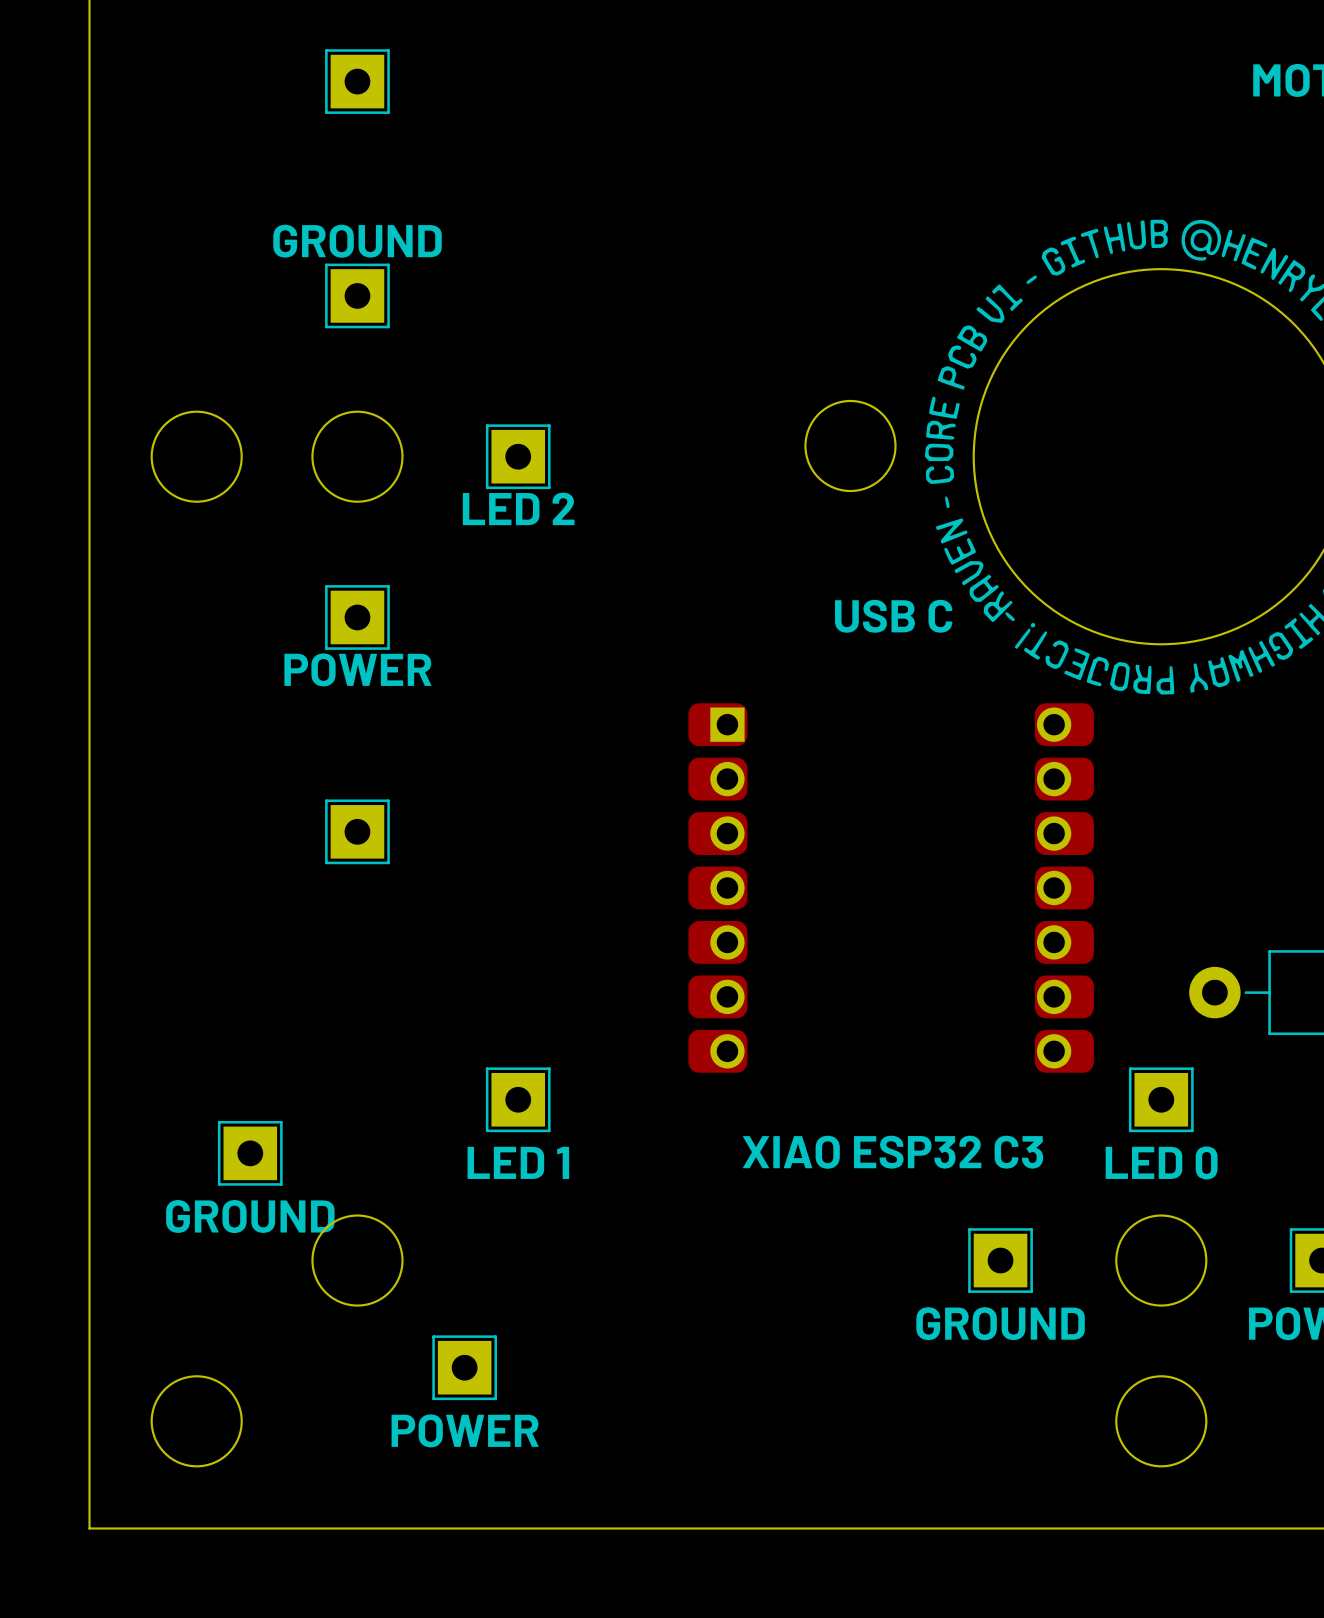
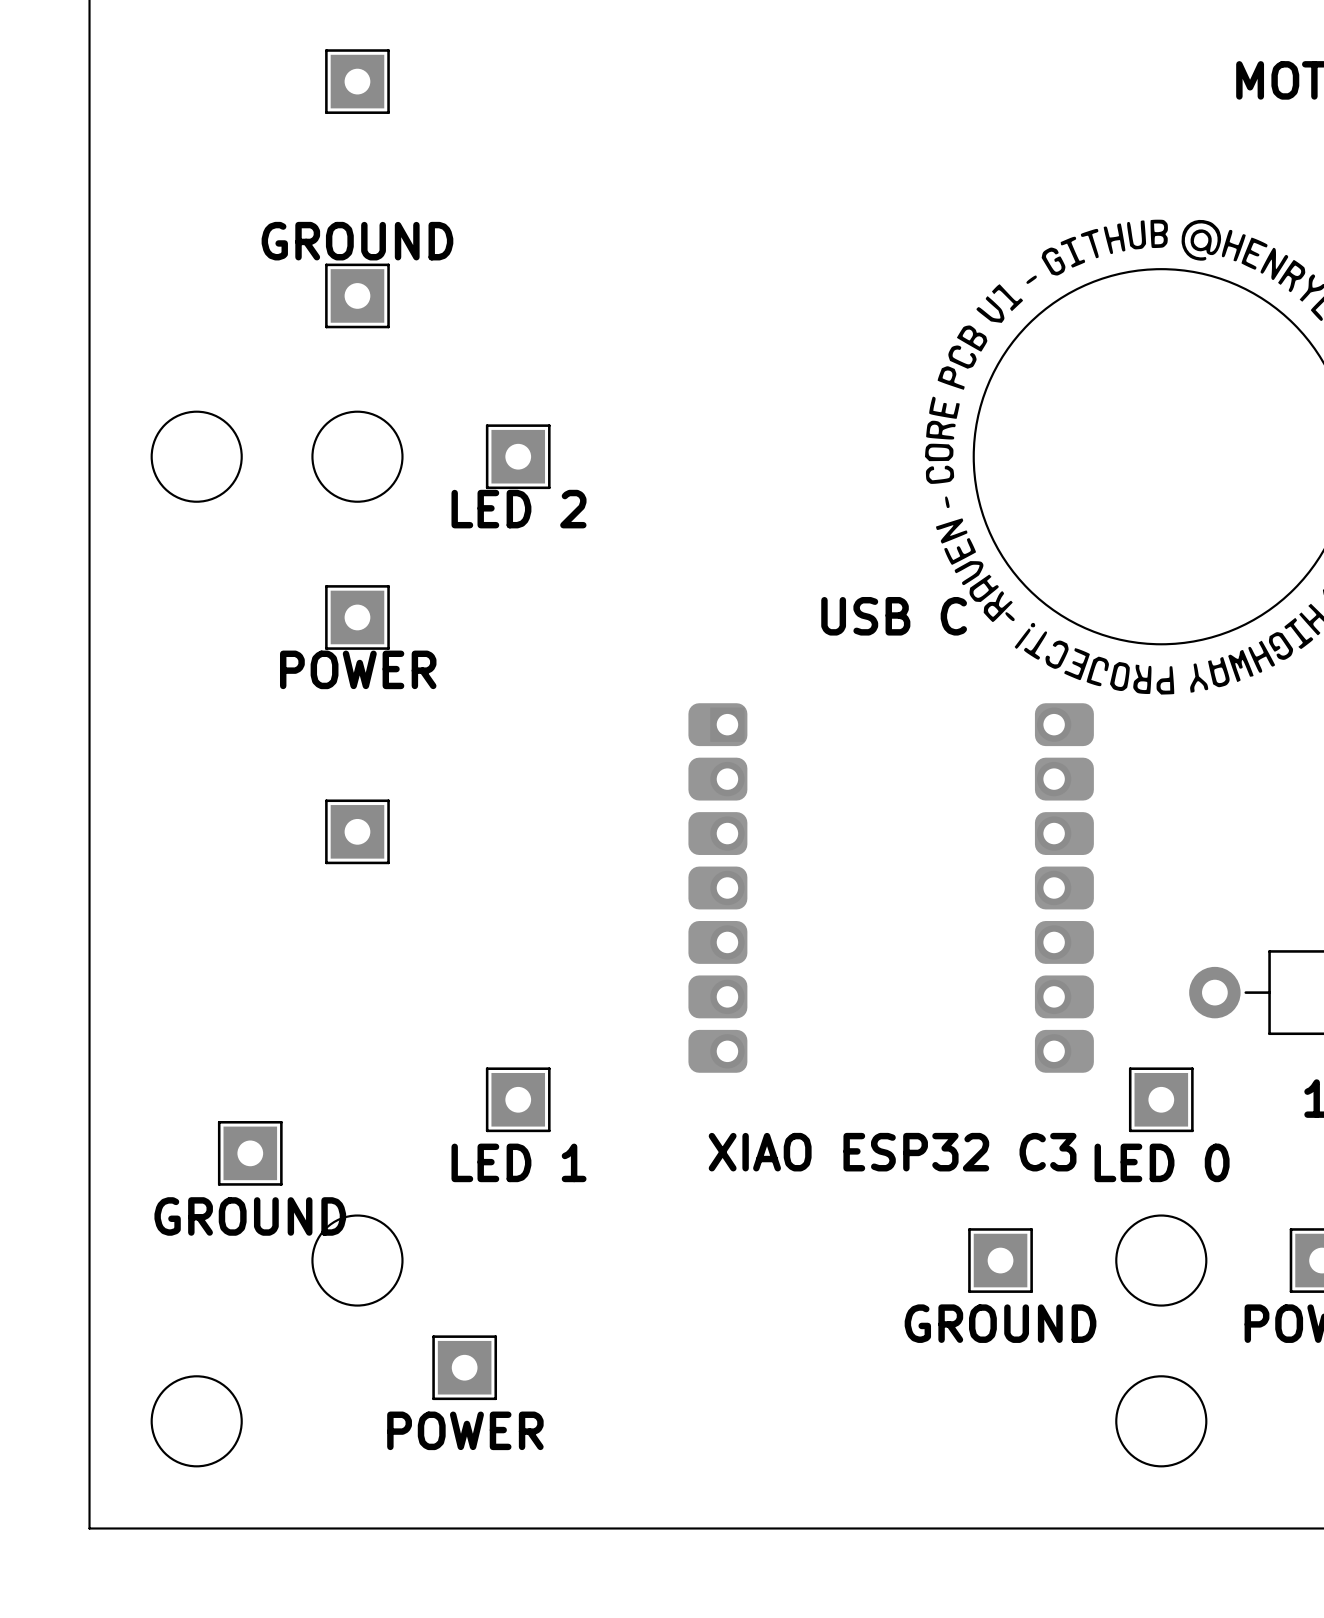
round board edge: [804, 399, 897, 493] -> none

